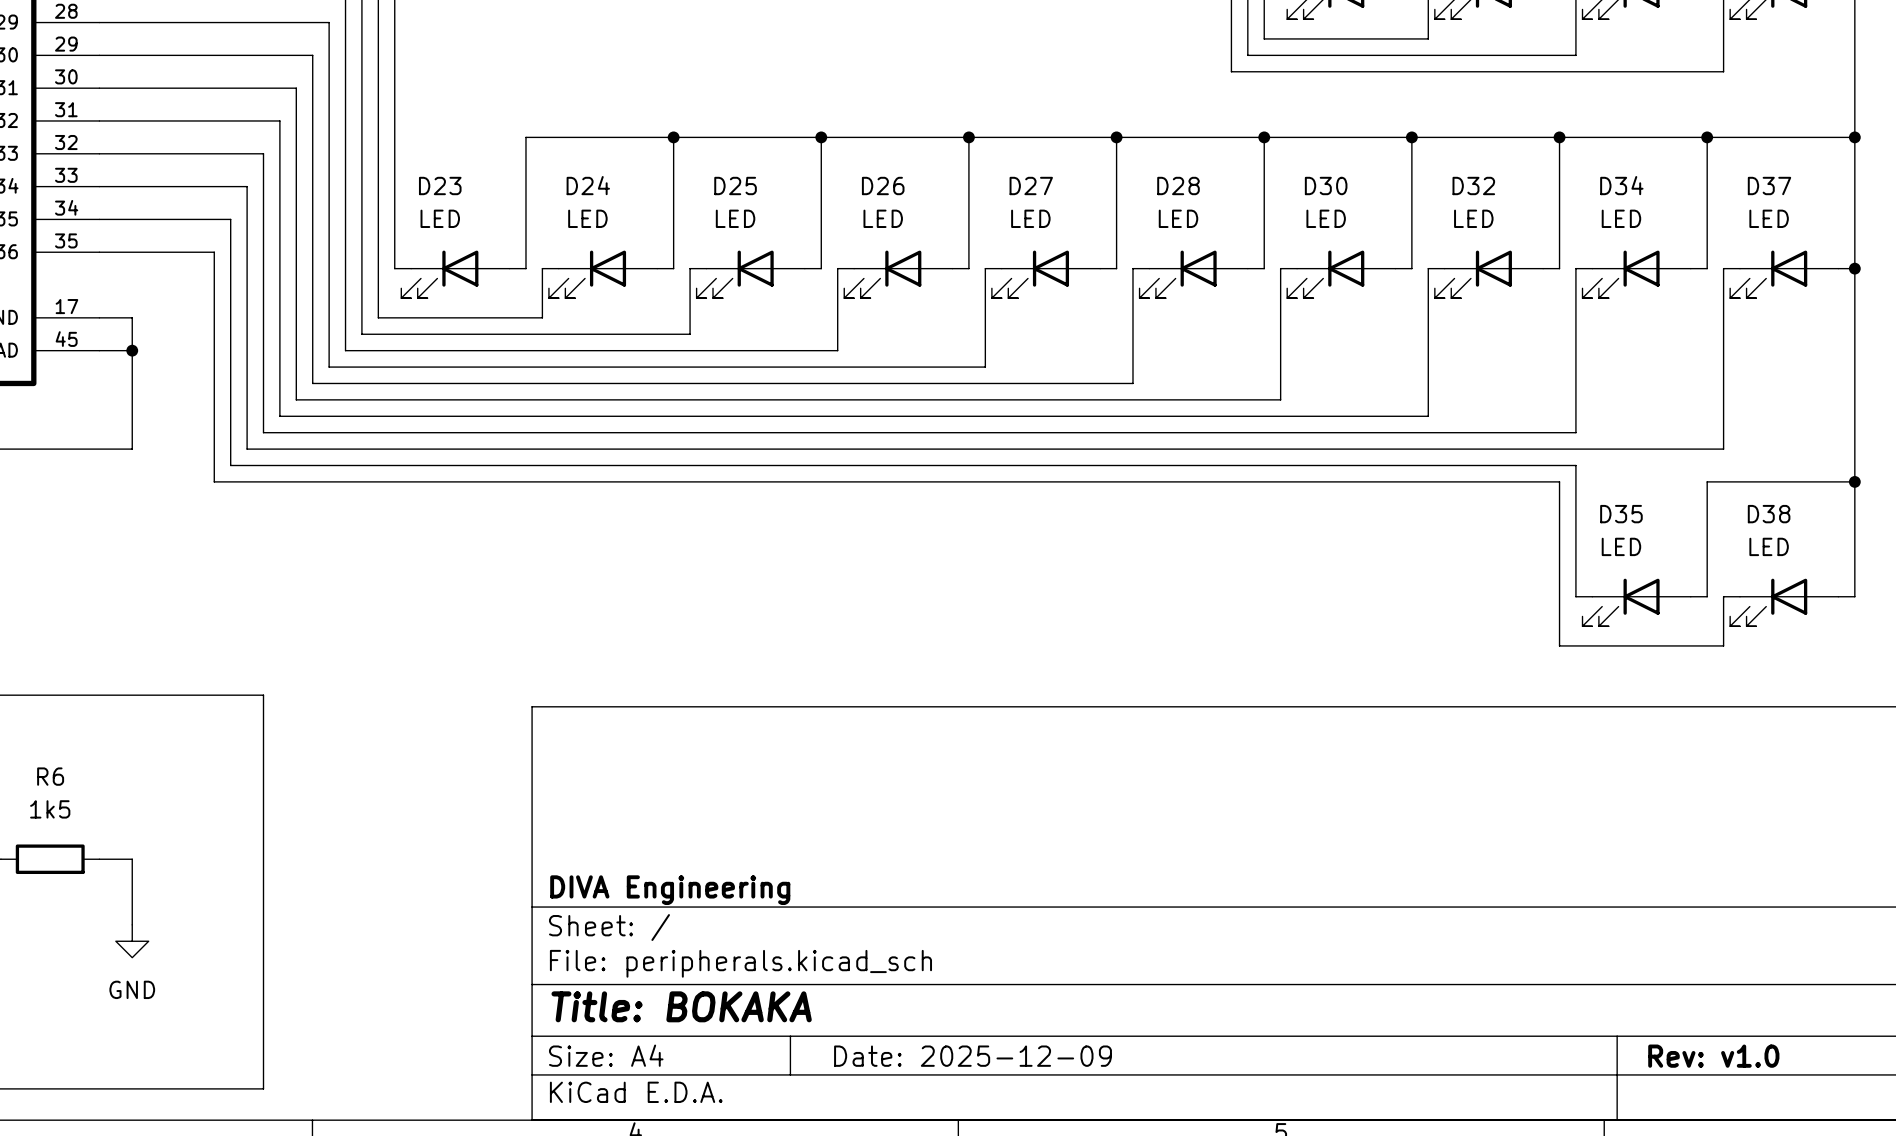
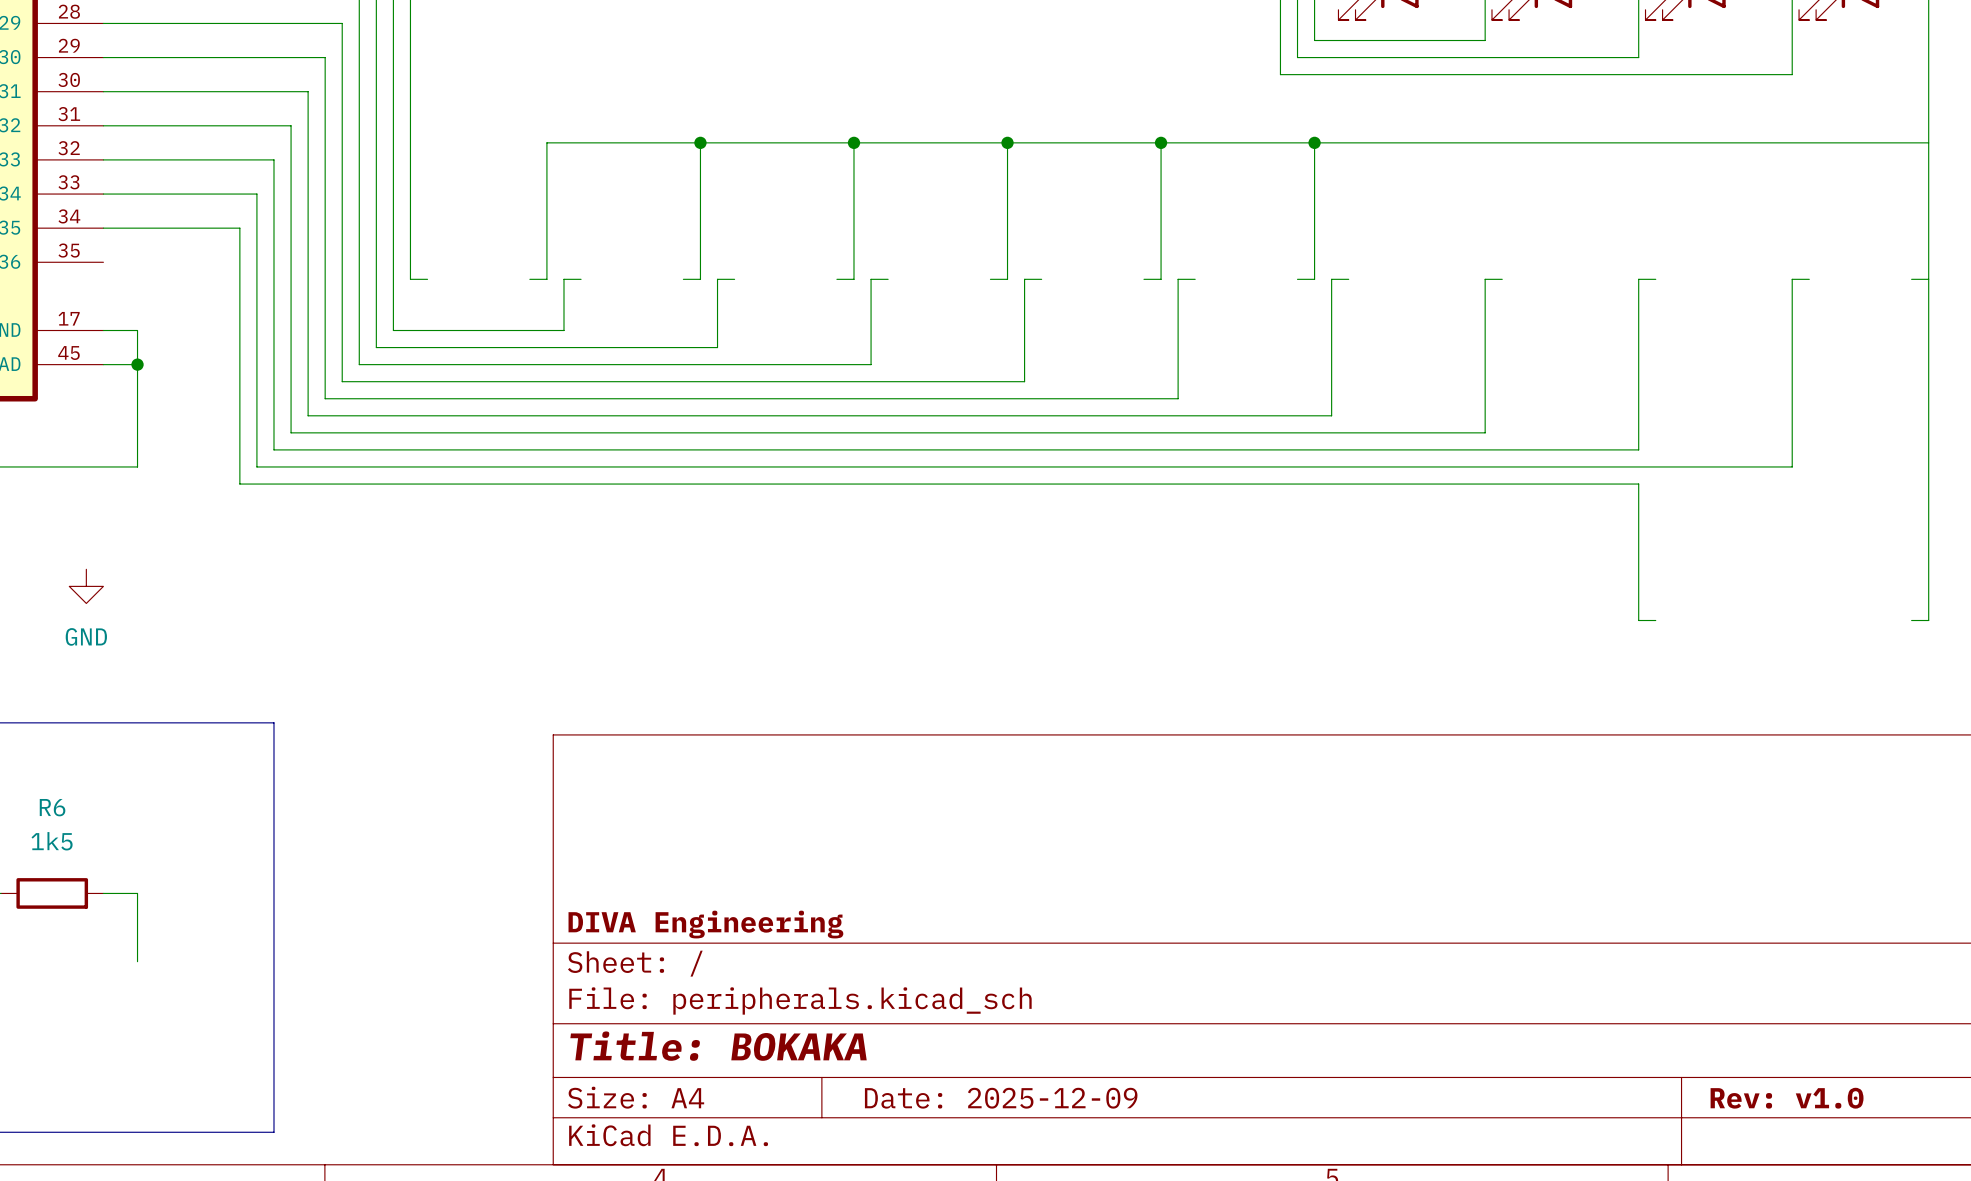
wire: (1411, 137) (1411, 268) (1395, 268) -> none
junction: (1411, 137) -> none
wire: (1559, 137) (1559, 268) (1543, 268) -> none
junction: (1559, 137) -> none
wire: (1707, 137) (1707, 268) (1690, 268) -> none
junction: (1707, 137) -> none
junction: (1854, 137) -> none
wire: (99, 252) (214, 252) (214, 481) (1559, 481) (1559, 645) (1723, 645) (1723, 596) (1740, 596) -> none
junction: (1854, 268) -> none
D23: LED (455, 274) -> none
D24: LED (603, 274) -> none
D25: LED (750, 274) -> none
D26: LED (898, 274) -> none
D27: LED (1046, 274) -> none
D28: LED (1193, 274) -> none
D30: LED (1341, 274) -> none
D32: LED (1488, 274) -> none
D34: LED (1636, 274) -> none
D37: LED (1784, 274) -> none
wire: (1854, 481) (1707, 481) (1707, 596) (1690, 596) -> none
junction: (1854, 481) -> none
power symbol: none -> GND (86, 586)
D35: LED (1636, 602) -> none
D38: LED (1784, 602) -> none
power symbol: GND (132, 941) -> none

